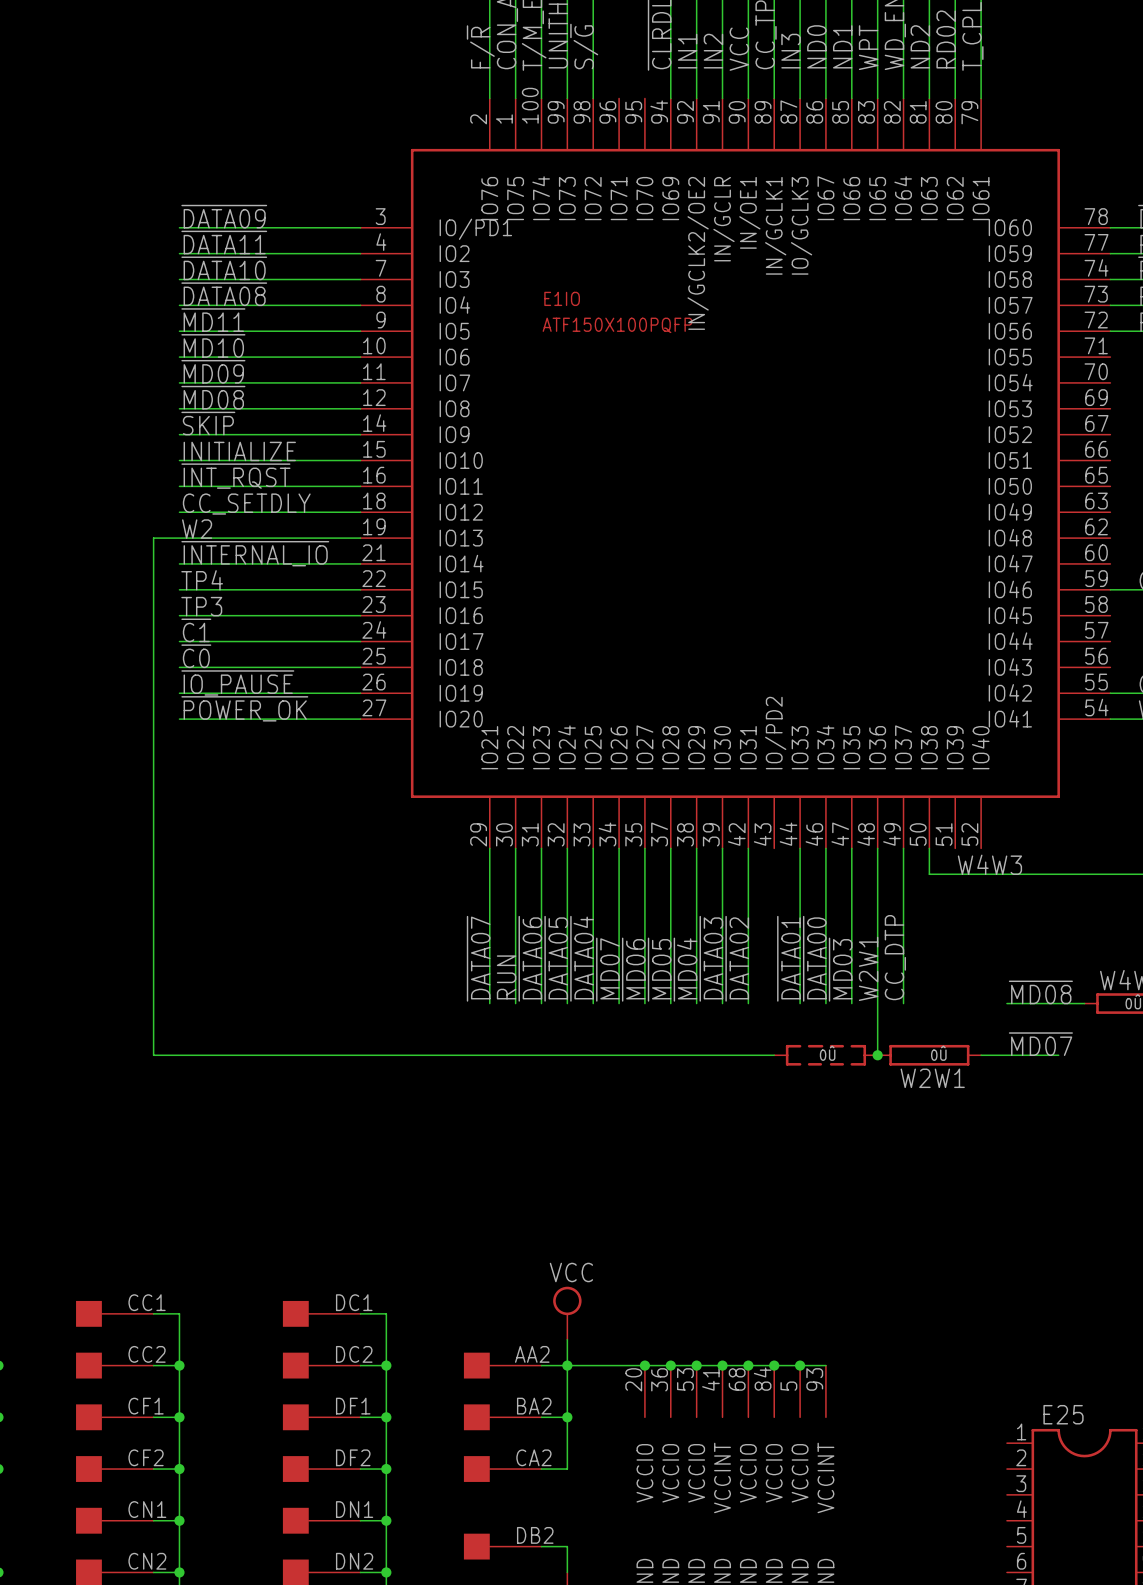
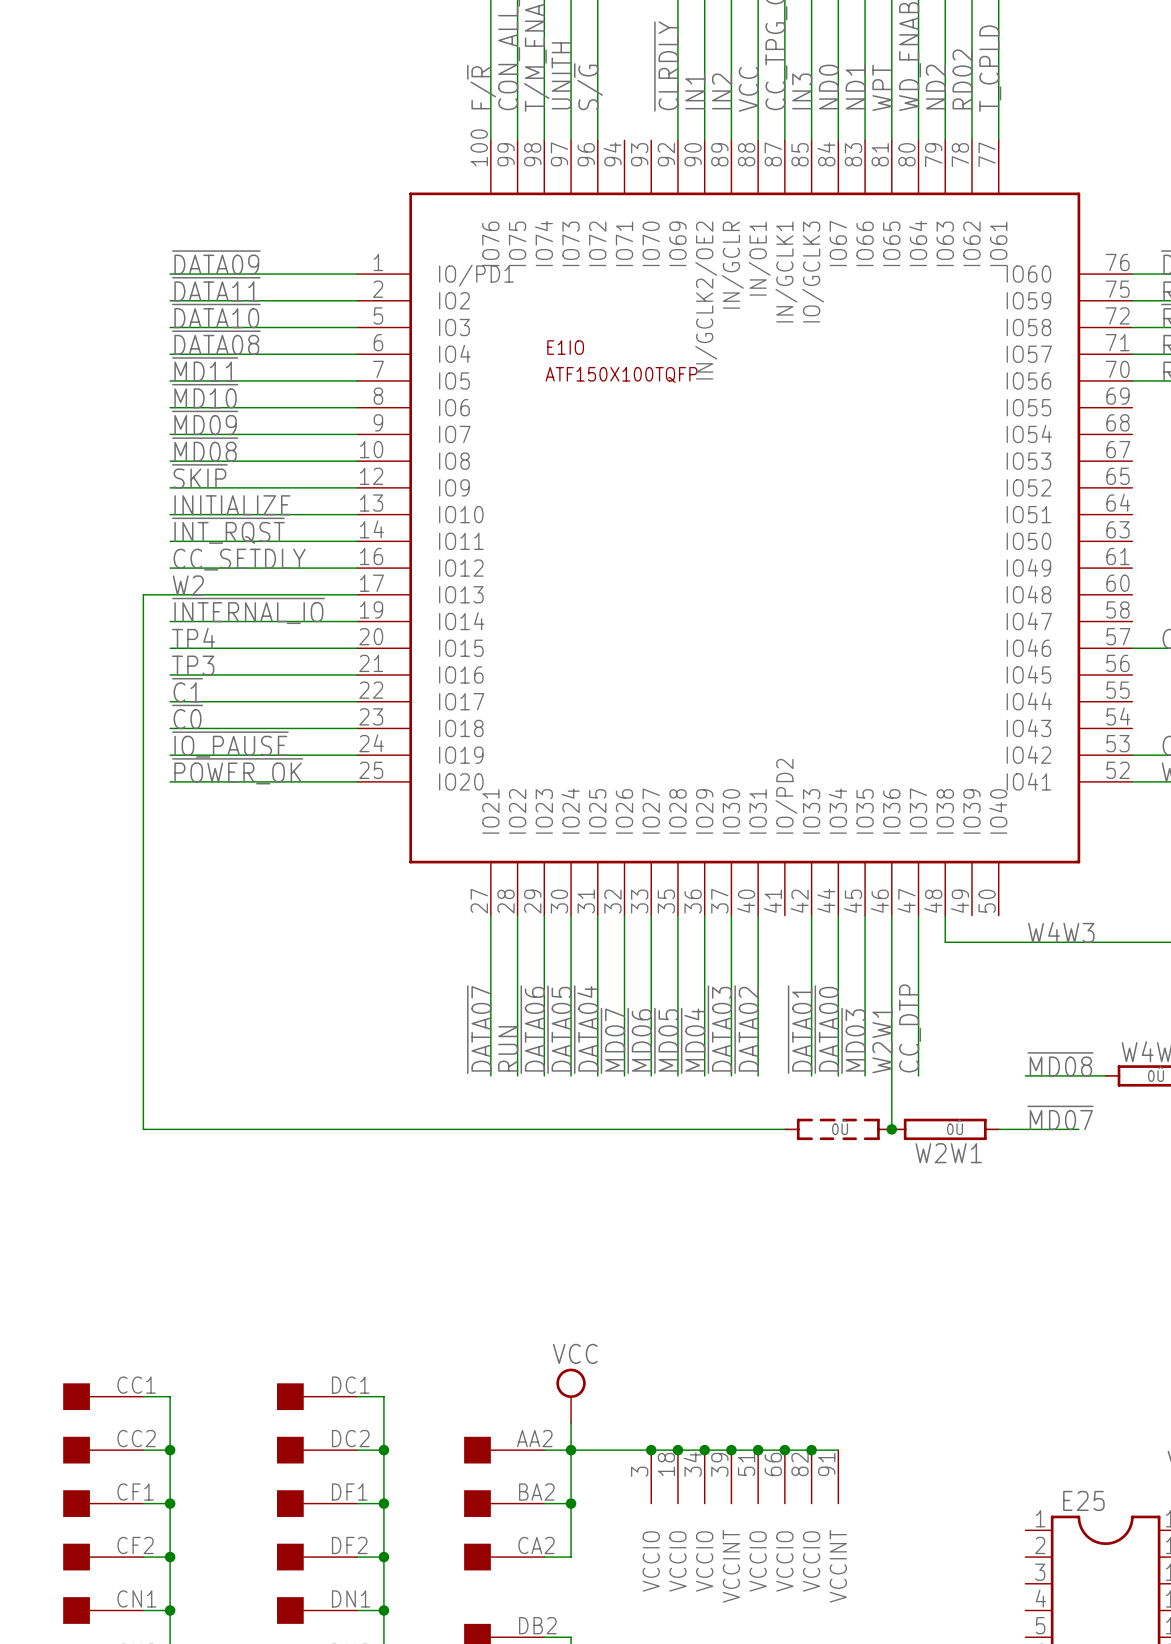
E1IO symbol: [360, 98, 1111, 849] -> [357, 140, 1133, 916]
E1IO value: ATF150X100PQFP (617, 325) -> ATF150X100TQFP (621, 374)
label position: W4W3 (989, 864) -> W4W3 (1061, 932)
part pin number: 20 (633, 1379) -> 3 (639, 1471)
part pin number: 36 (659, 1379) -> 18 (666, 1464)
part pin number: 53 (685, 1379) -> 34 (692, 1464)
part pin number: 41 (710, 1379) -> 39 (719, 1464)
part pin number: 68 (737, 1379) -> 51 (746, 1464)
part pin number: 84 (762, 1379) -> 66 (773, 1464)
part pin number: 93 (814, 1379) -> 91 (826, 1464)
part pin number: 5 (788, 1386) -> 82 (800, 1464)

